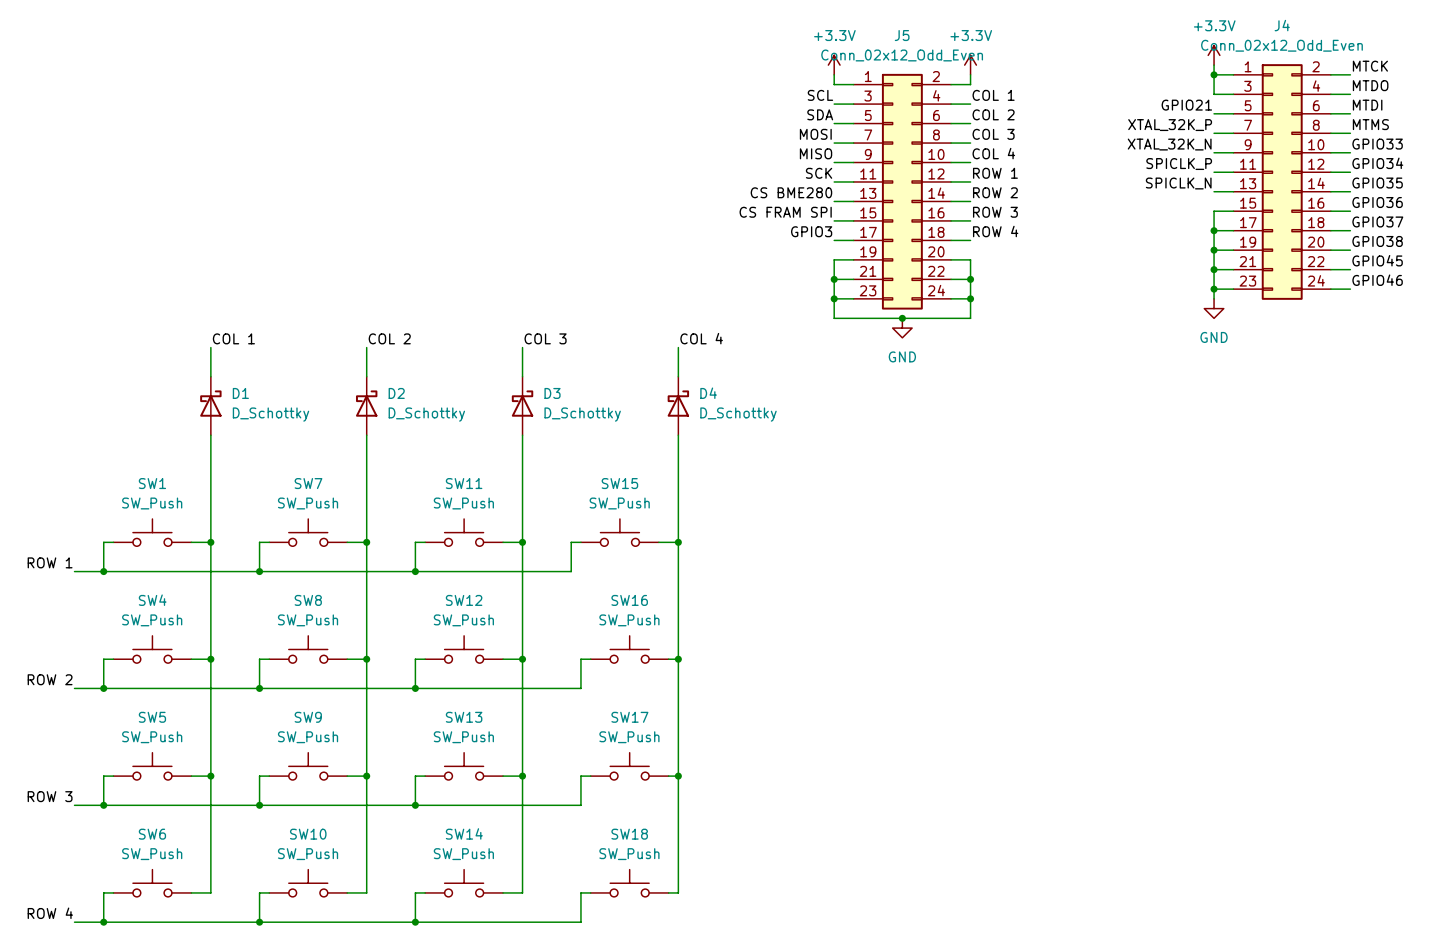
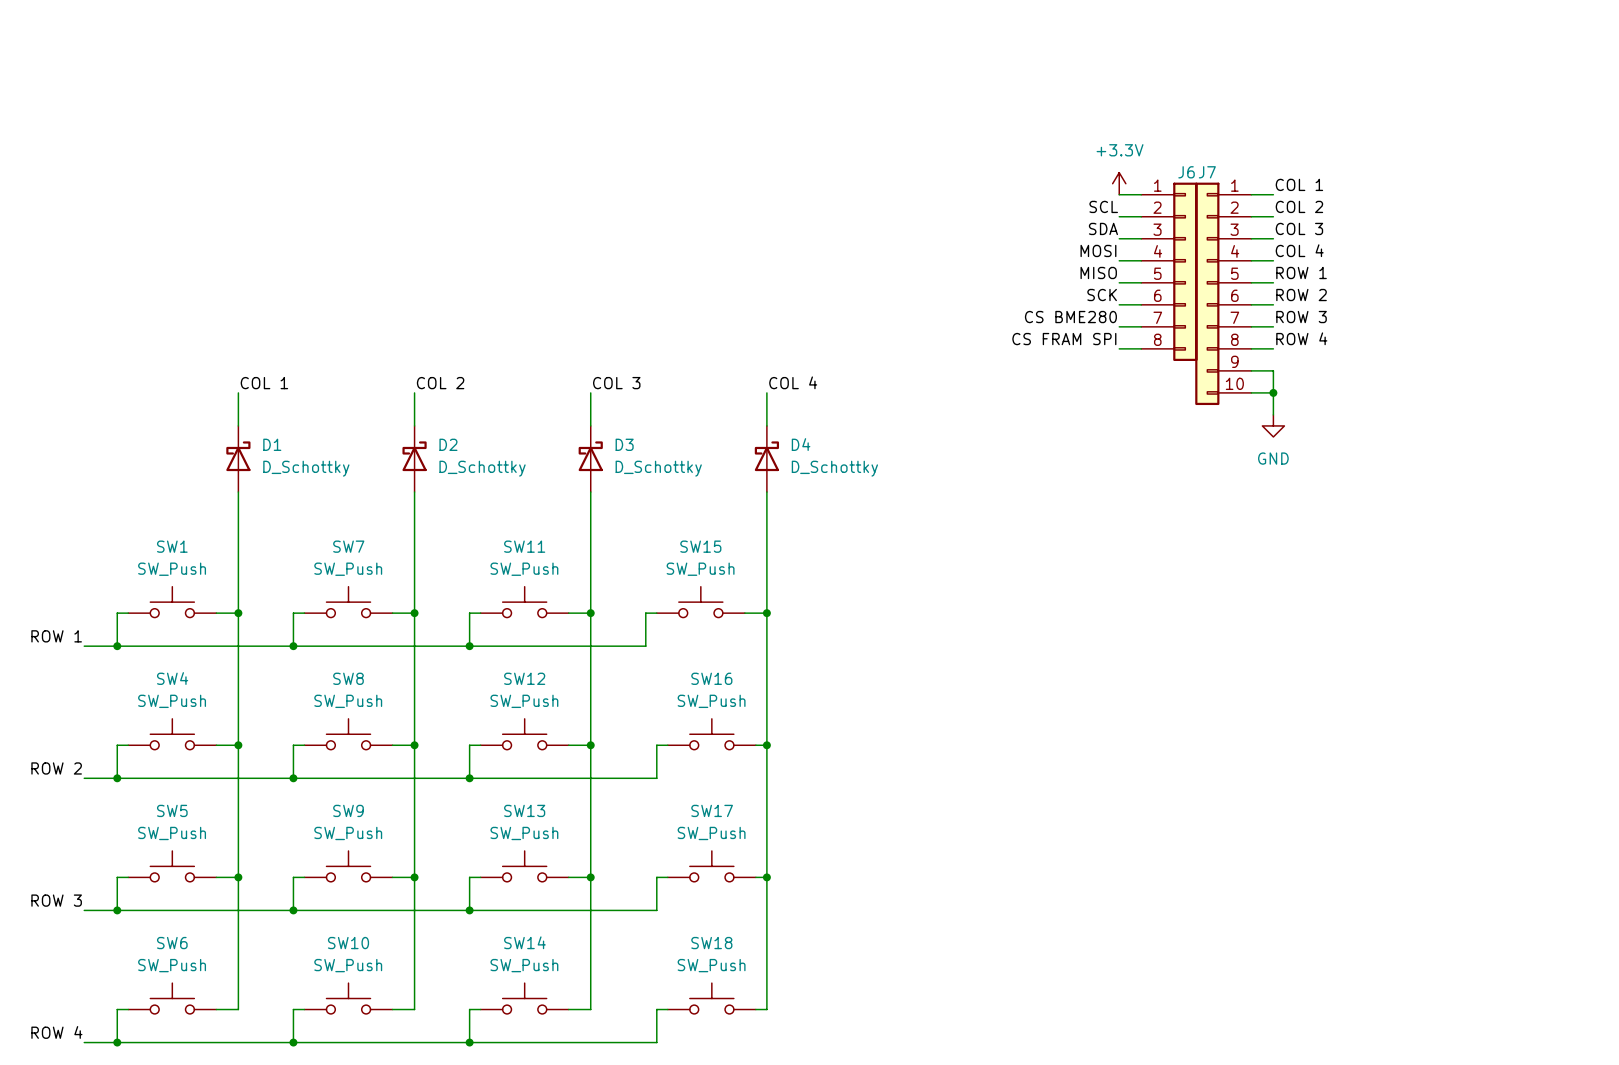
power symbol: +3.3V (1214, 55) -> none
power symbol: +3.3V (834, 65) -> none
power symbol: +3.3V (970, 65) -> none
wire: (1214, 65) (1214, 94) (1233, 94) -> none
label: MTCK (1370, 66) -> none
wire: (834, 74) (834, 84) (853, 84) -> none
wire: (970, 74) (970, 84) (951, 84) -> none
wire: (1214, 74) (1233, 74) -> none
junction: (1214, 74) -> none
wire: (1330, 74) (1350, 74) -> none
label: MTDO (1370, 85) -> none
wire: (1330, 94) (1350, 94) -> none
label position: SCL (820, 95) -> SCL (1103, 206)
label position: COL 1 (993, 95) -> COL 1 (1299, 184)
wire: (834, 104) (853, 104) -> (1119, 194) (1141, 194)
wire: (951, 104) (970, 104) -> (1251, 194) (1273, 194)
label: GPIO21 (1186, 105) -> none
label: MTDI (1367, 105) -> none
wire: (1214, 113) (1233, 113) -> none
wire: (1330, 113) (1350, 113) -> none
label position: SDA (820, 114) -> SDA (1103, 228)
label position: COL 2 (993, 114) -> COL 2 (1299, 206)
wire: (834, 123) (853, 123) -> (1119, 216) (1141, 216)
wire: (951, 123) (970, 123) -> (1251, 216) (1273, 216)
label: MTMS (1370, 124) -> none
label: XTAL_32K_P (1170, 125) -> none
wire: (1214, 133) (1233, 133) -> none
wire: (1330, 133) (1350, 133) -> none
label position: MOSI (815, 134) -> MOSI (1098, 250)
label position: COL 3 (993, 134) -> COL 3 (1299, 228)
wire: (834, 143) (853, 143) -> (1119, 238) (1141, 238)
wire: (951, 143) (970, 143) -> (1251, 238) (1273, 238)
label: XTAL_32K_N (1169, 144) -> none
label: GPIO33 (1377, 144) -> none
wire: (1214, 152) (1233, 152) -> none
wire: (1330, 152) (1350, 152) -> none
label position: MISO (816, 153) -> MISO (1098, 272)
label position: COL 4 (993, 153) -> COL 4 (1299, 250)
wire: (834, 162) (853, 162) -> (1119, 260) (1141, 260)
wire: (951, 162) (970, 162) -> (1251, 260) (1273, 260)
power symbol: none -> +3.3V (1119, 183)
label: GPIO34 (1377, 163) -> none
label: SPICLK_P (1179, 164) -> none
wire: (1214, 172) (1233, 172) -> none
wire: (1330, 172) (1350, 172) -> none
label position: SCK (819, 173) -> SCK (1102, 295)
label position: ROW 1 (995, 173) -> ROW 1 (1301, 272)
wire: (834, 181) (853, 181) -> (1119, 282) (1141, 282)
wire: (951, 181) (970, 181) -> (1251, 282) (1273, 282)
J4: Conn_02x12_Odd_Even (1282, 181) -> none
label: SPICLK_N (1178, 183) -> none
label: GPIO35 (1377, 183) -> none
J5: Conn_02x12_Odd_Even (902, 191) -> none
wire: (1214, 191) (1233, 191) -> none
wire: (1330, 191) (1350, 191) -> none
label position: CS BME280 (791, 192) -> CS BME280 (1070, 317)
label position: ROW 2 (995, 192) -> ROW 2 (1301, 295)
wire: (834, 201) (853, 201) -> (1119, 304) (1141, 304)
wire: (951, 201) (970, 201) -> (1251, 304) (1273, 304)
label: GPIO36 (1377, 202) -> none
wire: (1233, 211) (1214, 211) (1214, 298) -> none
wire: (1330, 211) (1350, 211) -> none
label position: CS FRAM SPI (785, 212) -> CS FRAM SPI (1064, 339)
label position: ROW 3 (995, 212) -> ROW 3 (1301, 317)
wire: (834, 220) (853, 220) -> (1119, 326) (1141, 326)
wire: (951, 220) (970, 220) -> (1251, 326) (1273, 326)
label: GPIO37 (1377, 221) -> none
wire: (1214, 230) (1233, 230) -> none
junction: (1214, 230) -> none
wire: (1330, 230) (1350, 230) -> none
label: GPIO3 (811, 231) -> none
label position: ROW 4 (995, 231) -> ROW 4 (1301, 338)
wire: (834, 240) (853, 240) -> (1119, 348) (1141, 348)
wire: (951, 240) (970, 240) -> (1251, 348) (1273, 348)
J6: none -> (1169, 271)
label: GPIO38 (1377, 241) -> none
wire: (1214, 250) (1233, 250) -> none
junction: (1214, 250) -> none
wire: (1330, 250) (1350, 250) -> none
wire: (853, 259) (834, 259) (834, 318) (970, 318) (970, 259) (951, 259) -> none
J7: none -> (1223, 293)
label: GPIO45 (1377, 260) -> none
wire: (1214, 269) (1233, 269) -> none
junction: (1214, 269) -> none
wire: (1330, 269) (1350, 269) -> none
wire: (834, 279) (853, 279) -> none
junction: (834, 279) -> none
wire: (951, 279) (970, 279) -> (1251, 392) (1273, 392)
junction: (970, 279) -> none
label: GPIO46 (1377, 280) -> none
wire: (1214, 289) (1233, 289) -> none
junction: (1214, 289) -> none
wire: (1330, 289) (1350, 289) -> none
wire: (834, 298) (853, 298) -> none
junction: (834, 298) -> none
wire: (951, 298) (970, 298) -> none
junction: (970, 298) -> none
power symbol position: GND (1214, 308) -> GND (1273, 425)
junction: (902, 318) -> none
power symbol: GND (902, 328) -> none
wire: none -> (1251, 370) (1273, 370) (1273, 414)
junction: none -> (1273, 392)

